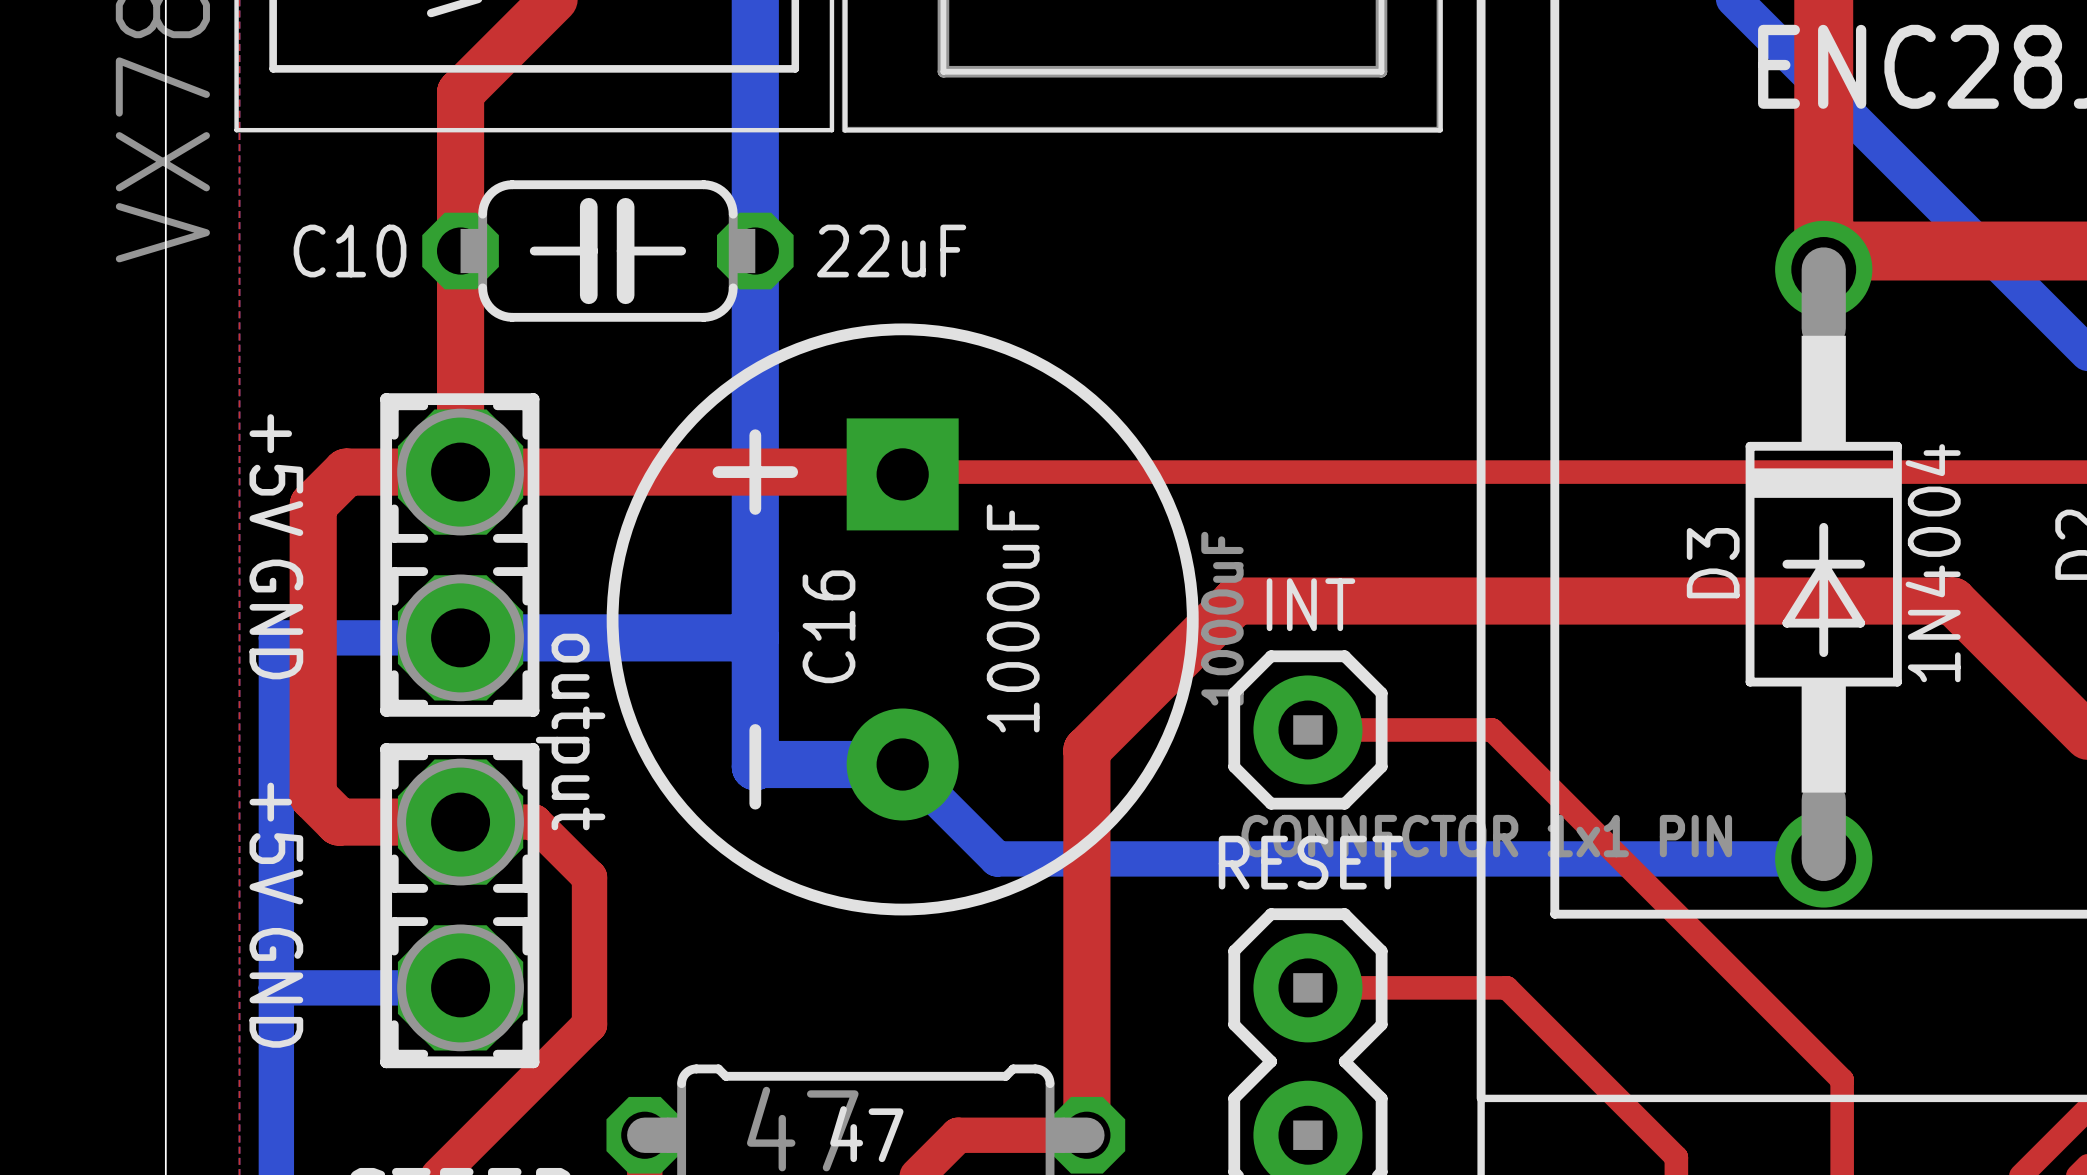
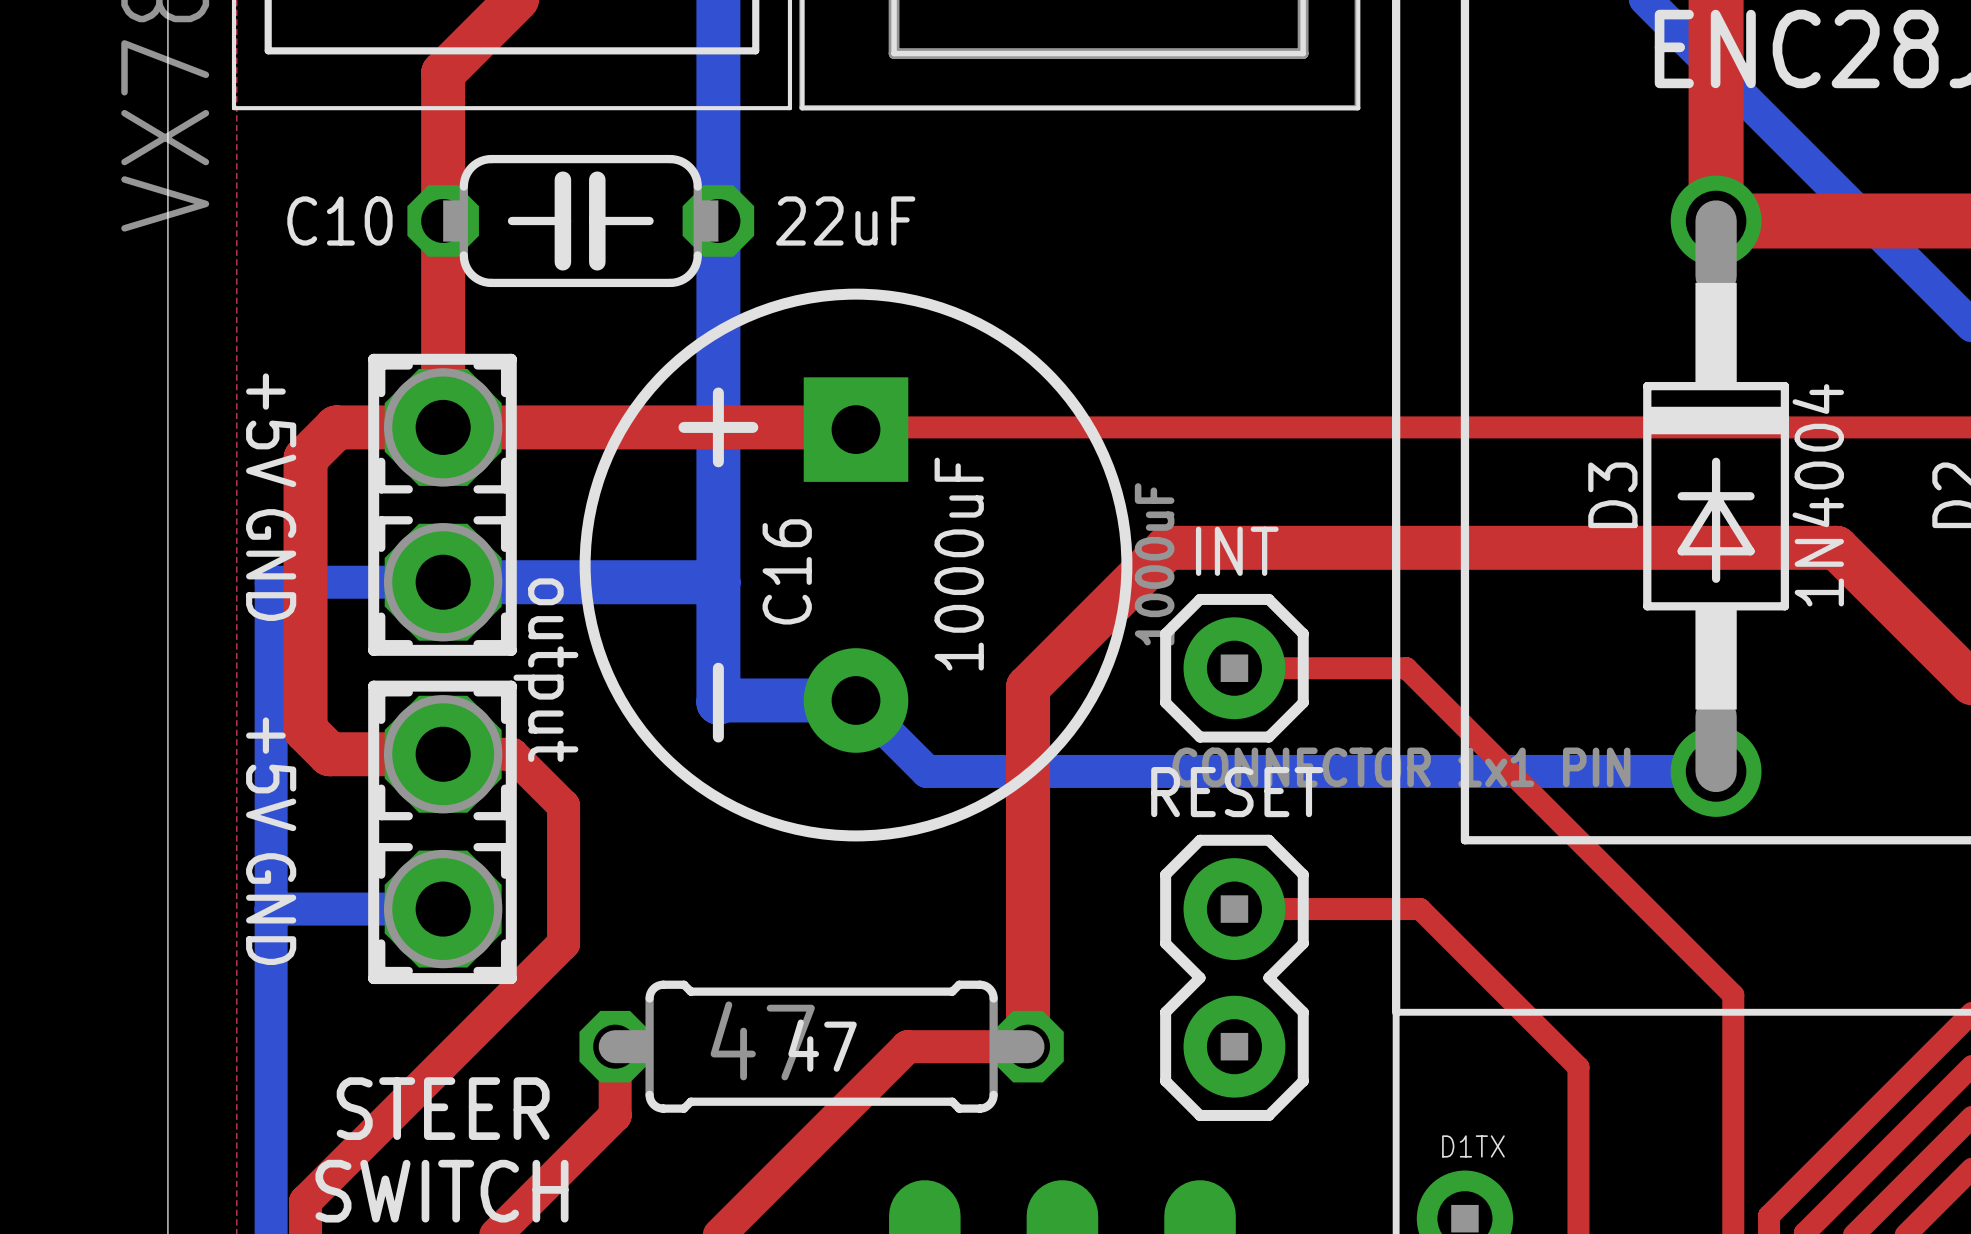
D3 position: (1823, 564) -> (1716, 496)
bottom track: (978, 840) (997, 858) (1823, 858) -> (926, 771) (1716, 771)

